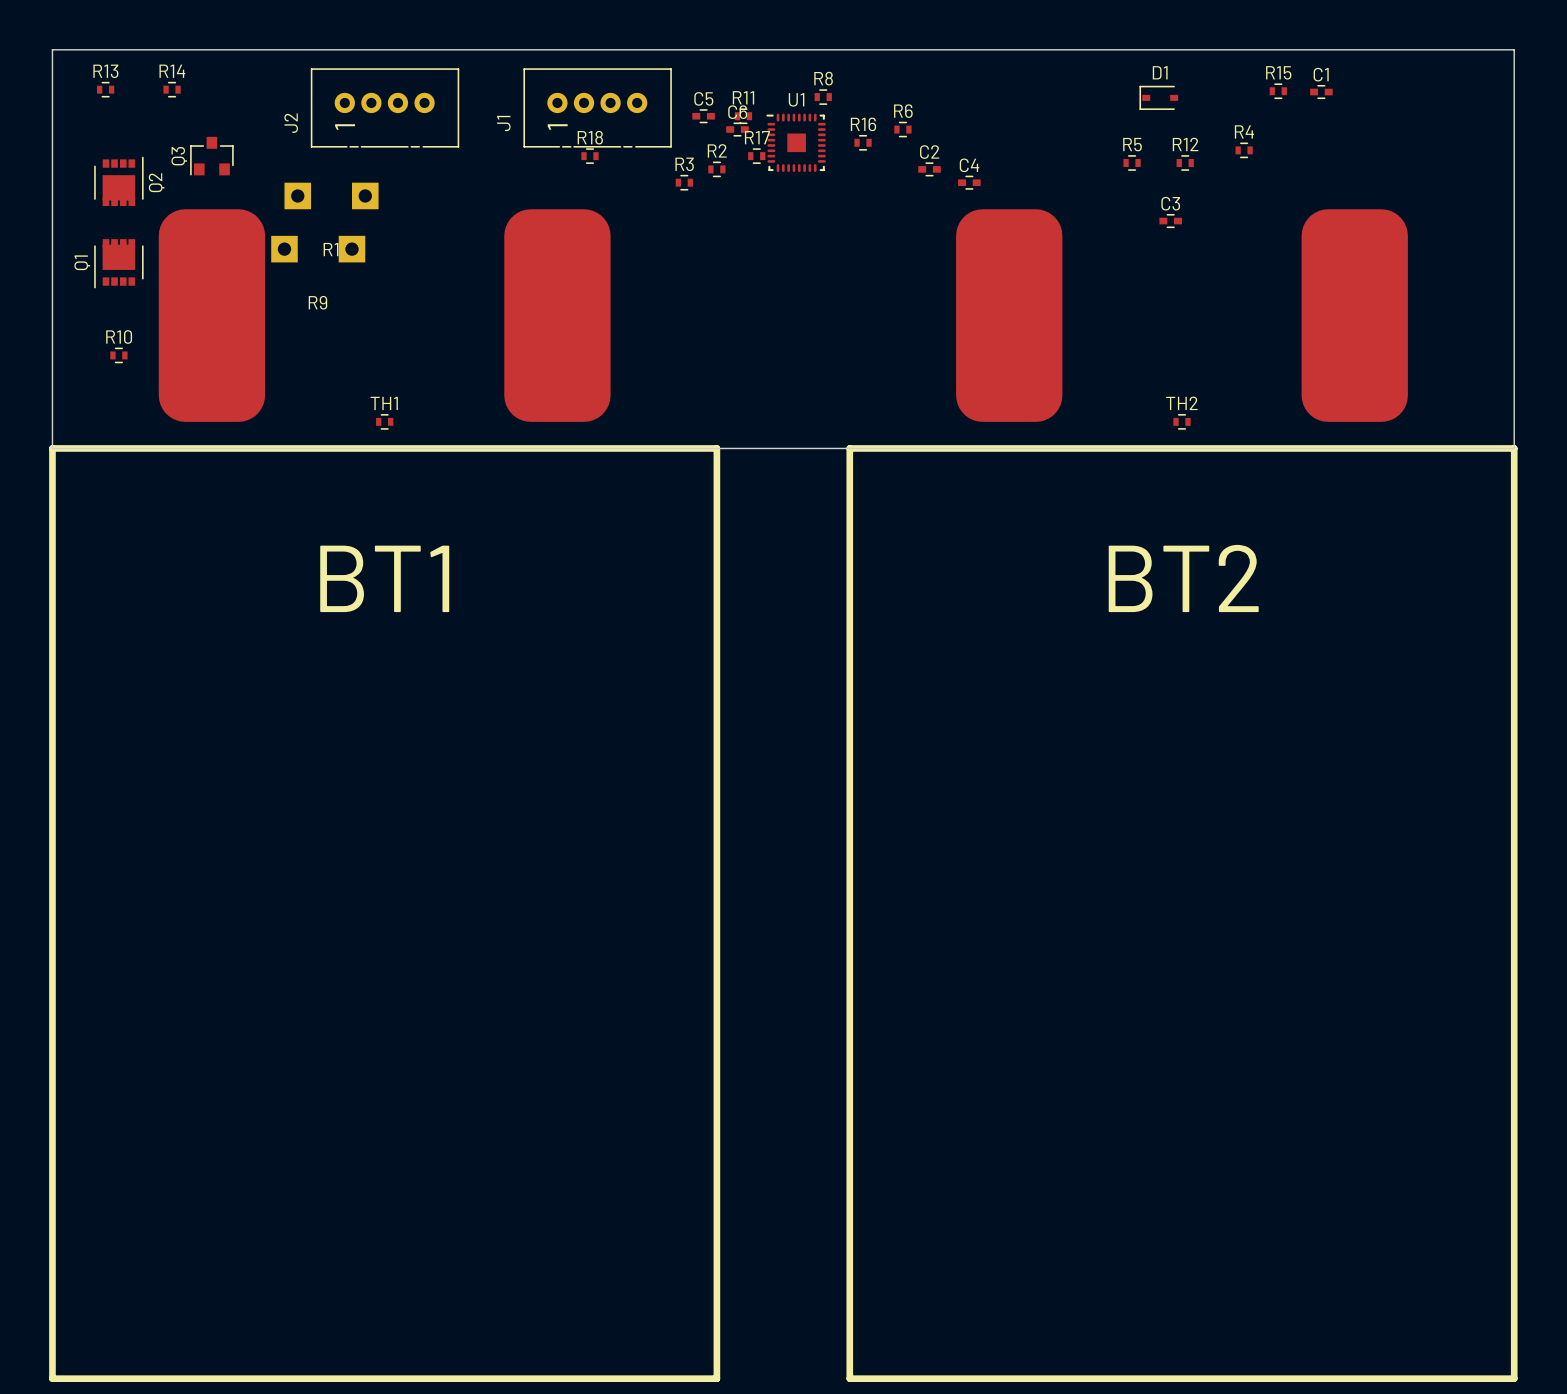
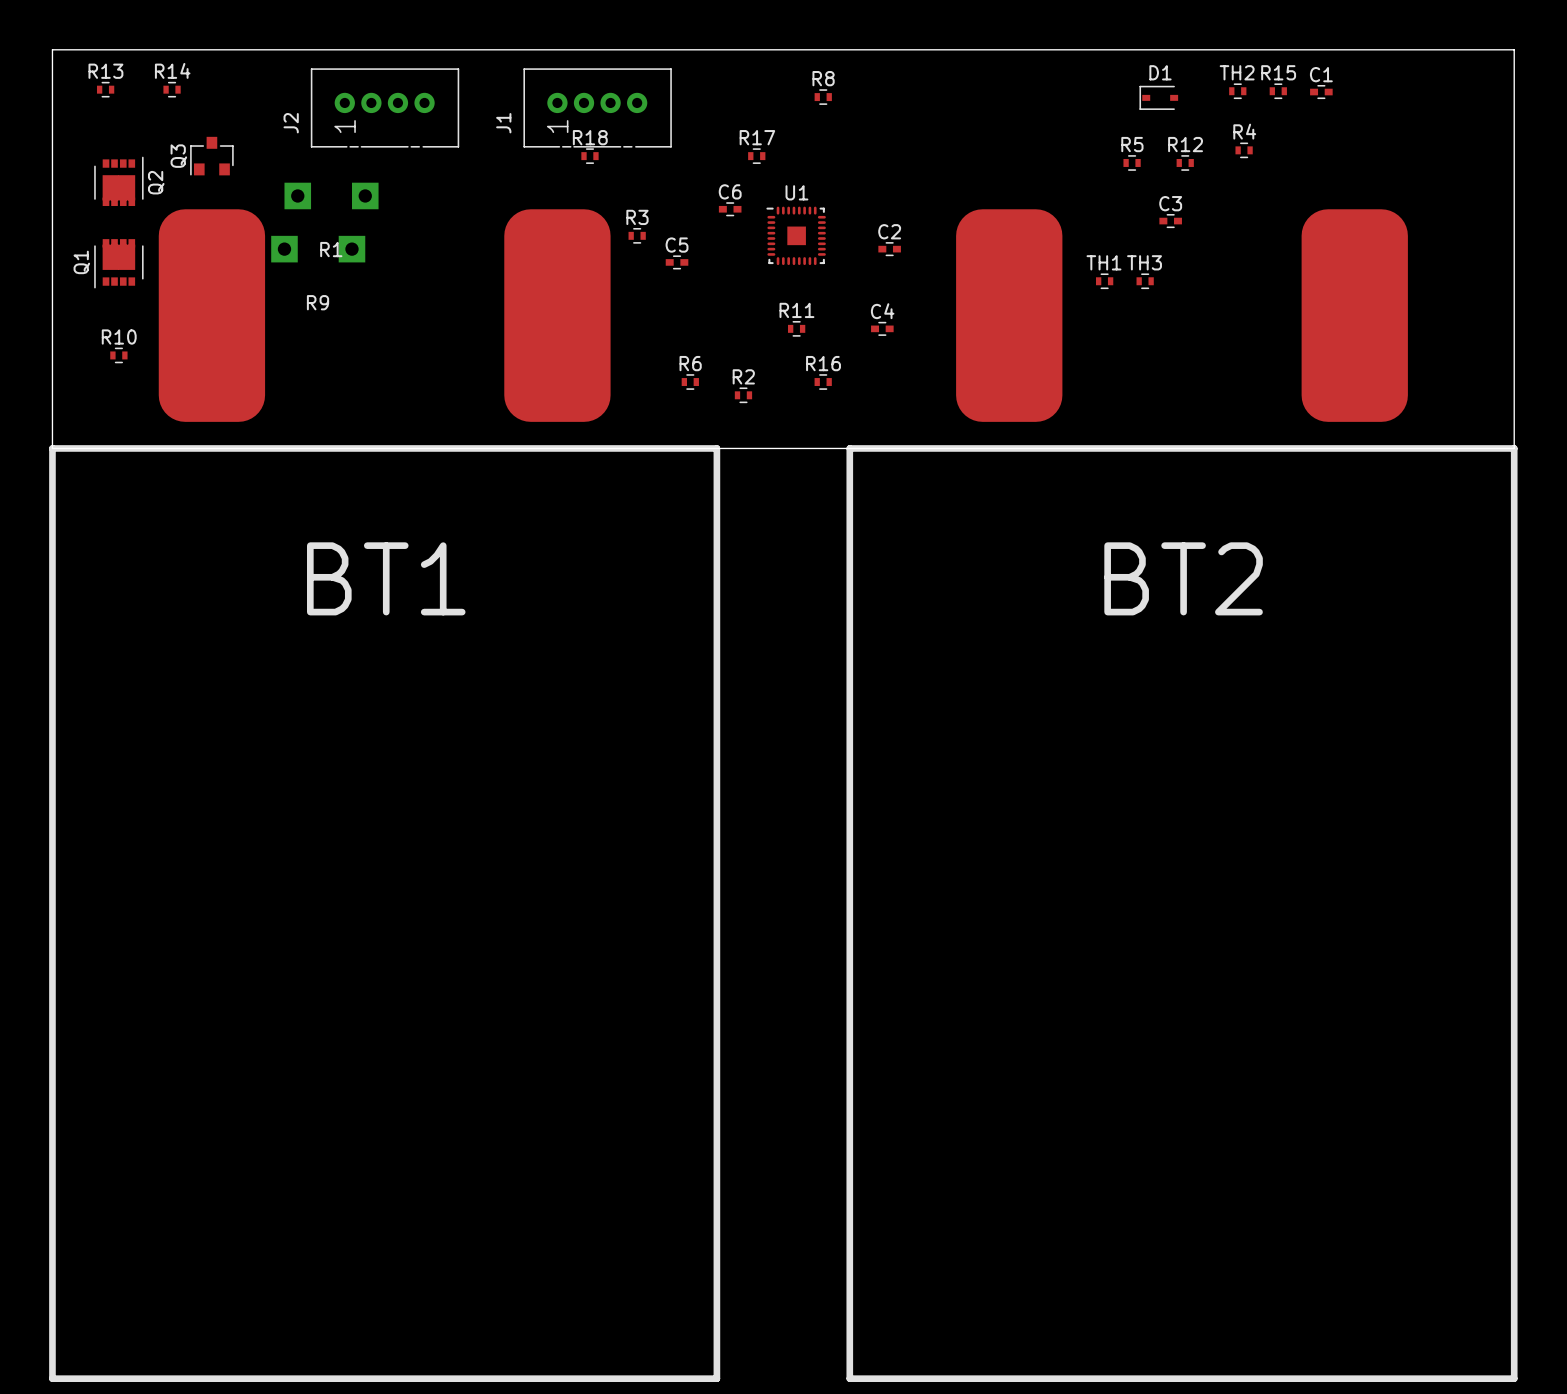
C5 position: (703, 116) -> (677, 262)
R11 position: (743, 116) -> (796, 328)
C6 position: (737, 129) -> (730, 209)
R6 position: (902, 129) -> (690, 382)
U1 position: (796, 142) -> (796, 235)
R16 position: (863, 142) -> (823, 382)
R2 position: (716, 169) -> (743, 395)
C2 position: (929, 169) -> (889, 249)
R3 position: (684, 182) -> (637, 235)
C4 position: (969, 182) -> (882, 328)
TH3: none -> (1145, 281)
TH1 position: (384, 421) -> (1104, 281)
TH2 position: (1182, 421) -> (1237, 91)

